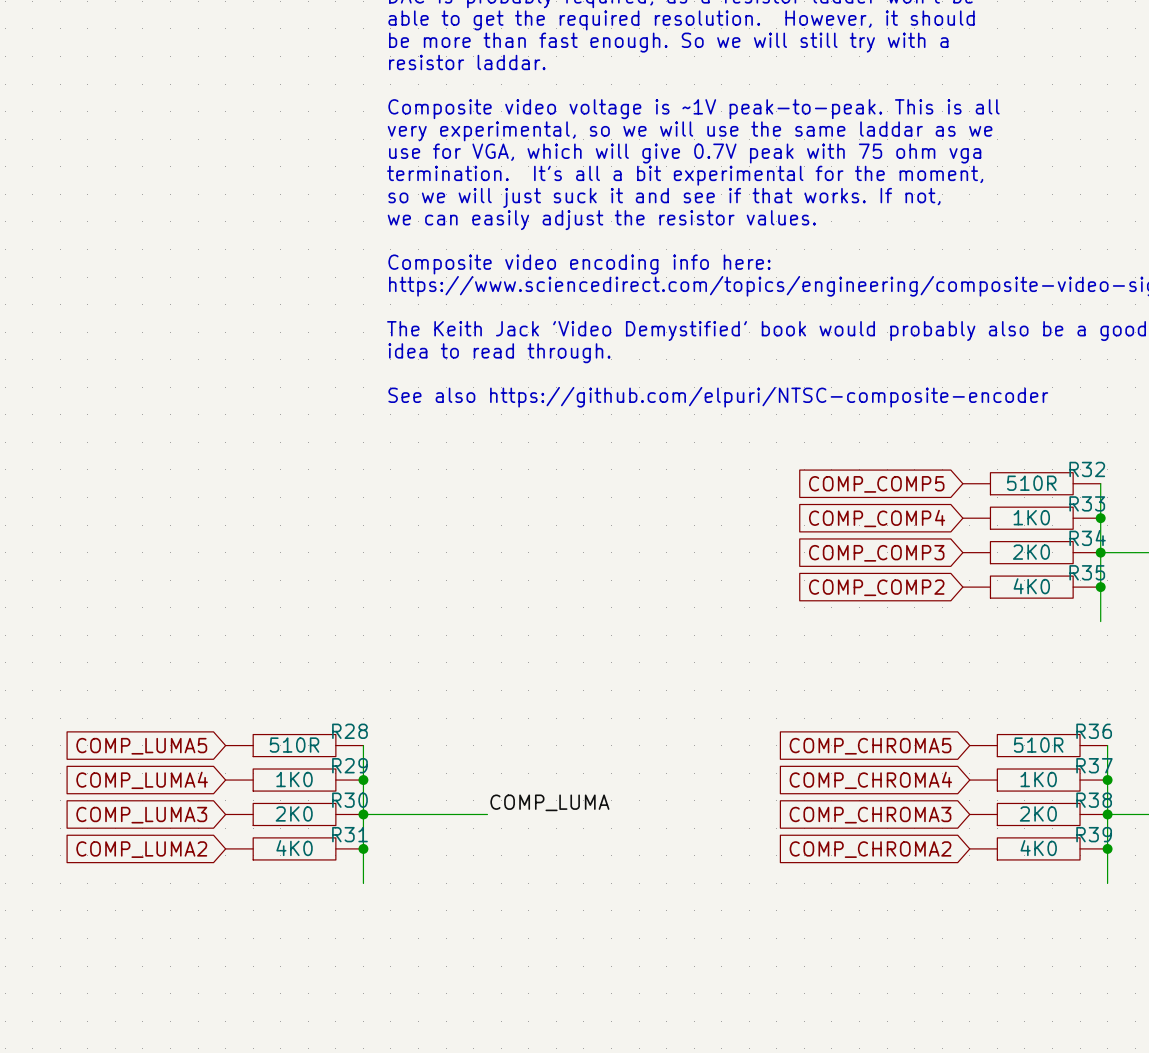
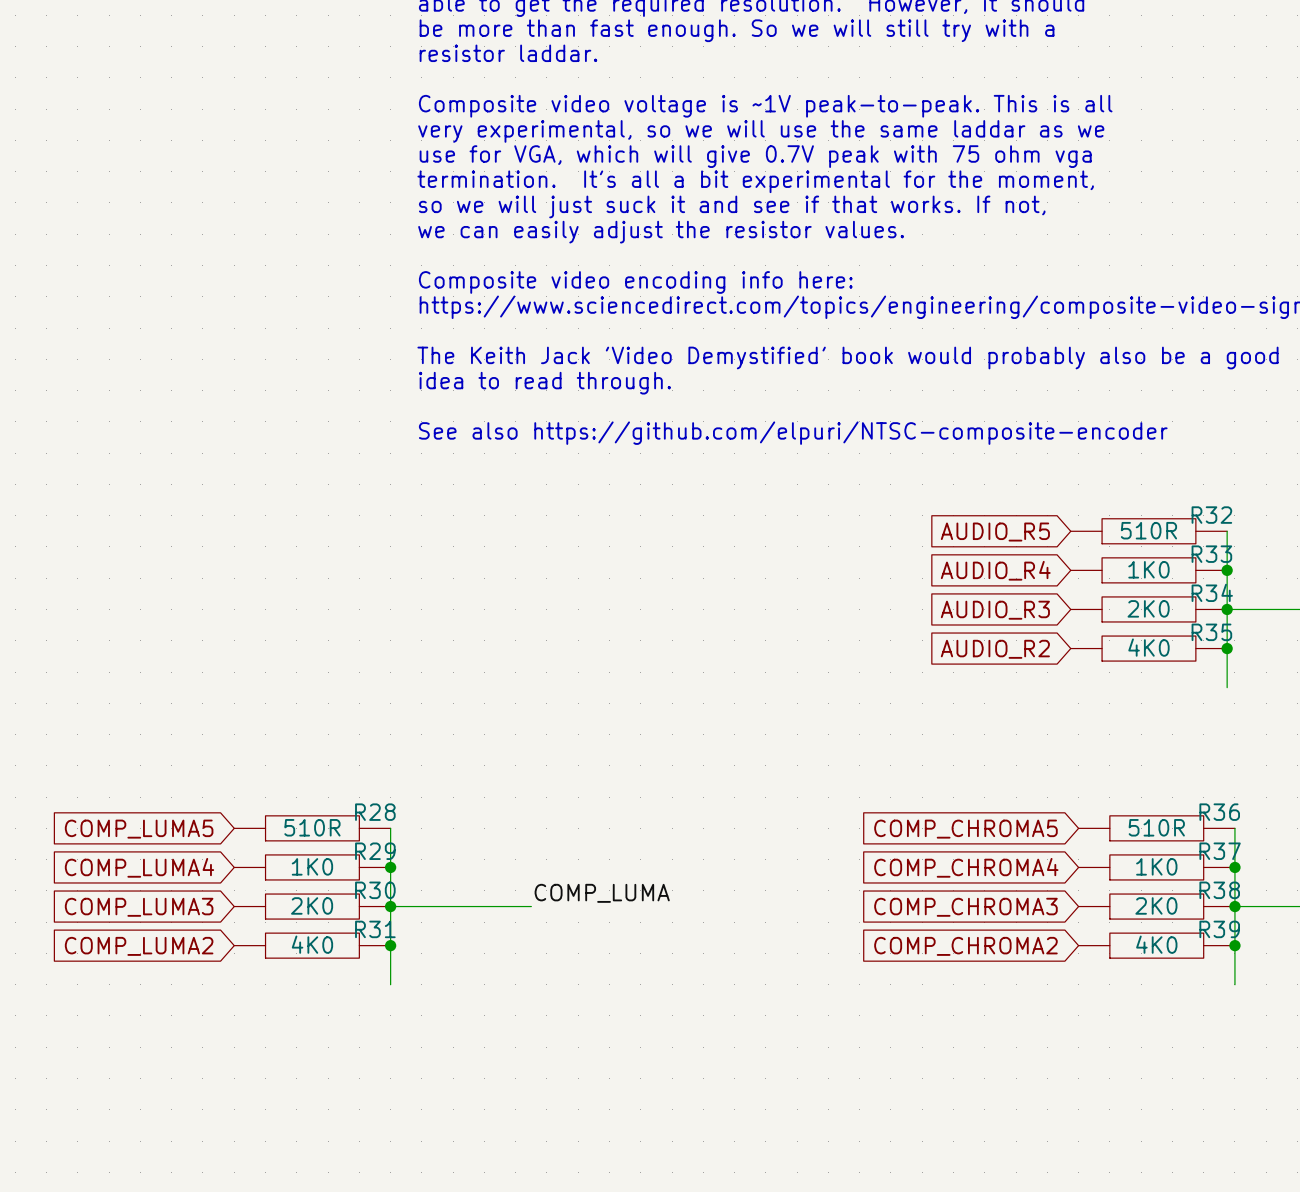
global label: COMP_COMP5 (876, 484) -> AUDIO_R5 (995, 532)
global label: COMP_COMP4 (877, 518) -> AUDIO_R4 (995, 570)
global label: COMP_COMP3 (876, 553) -> AUDIO_R3 (995, 610)
global label: COMP_COMP2 (876, 587) -> AUDIO_R2 (995, 649)

